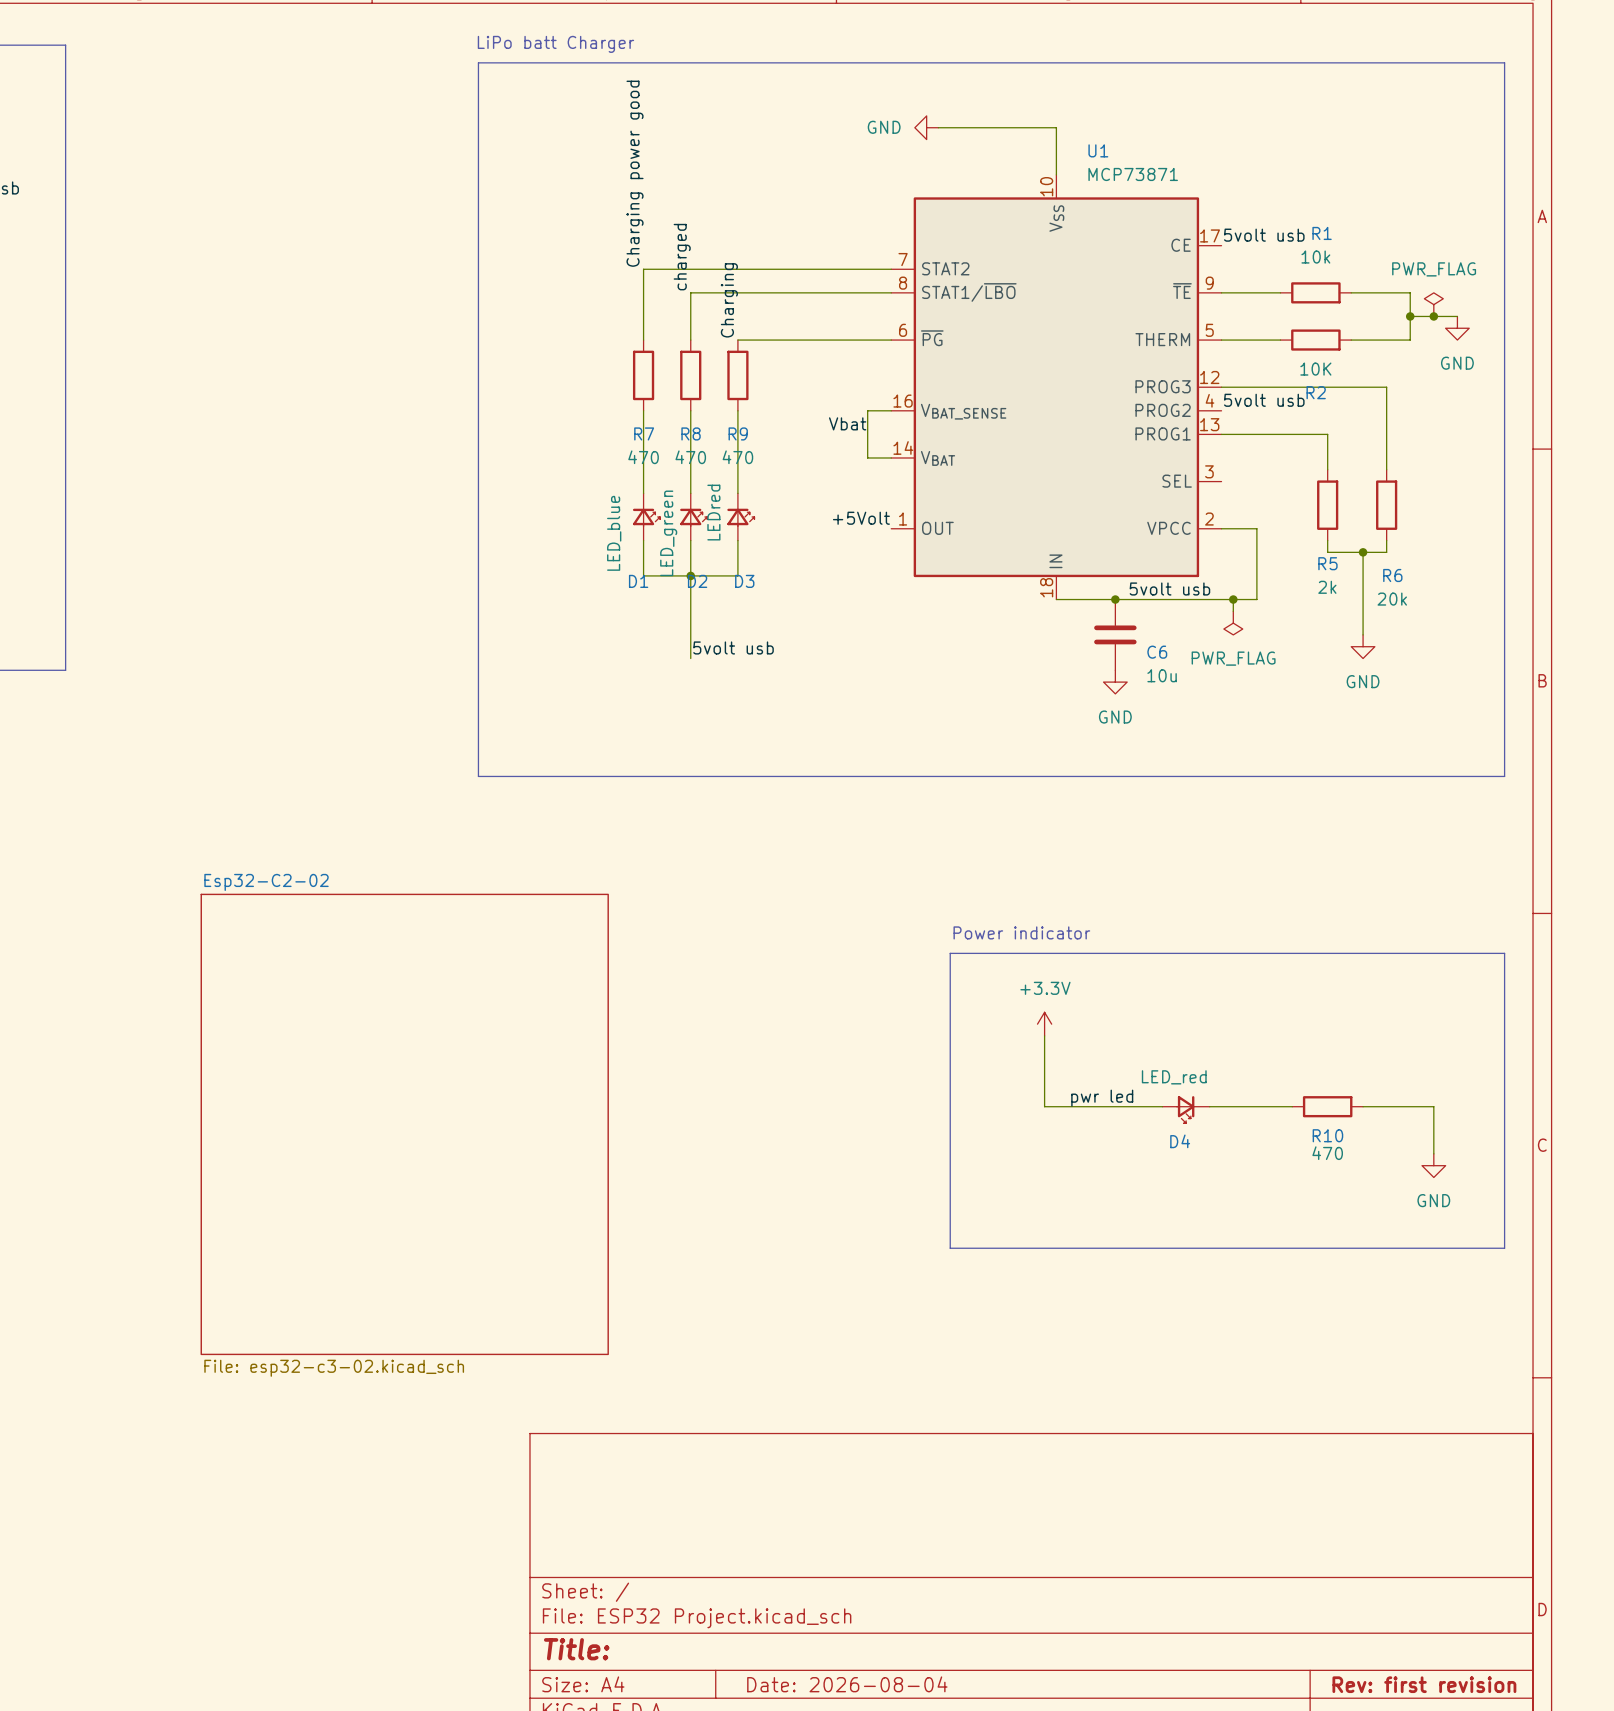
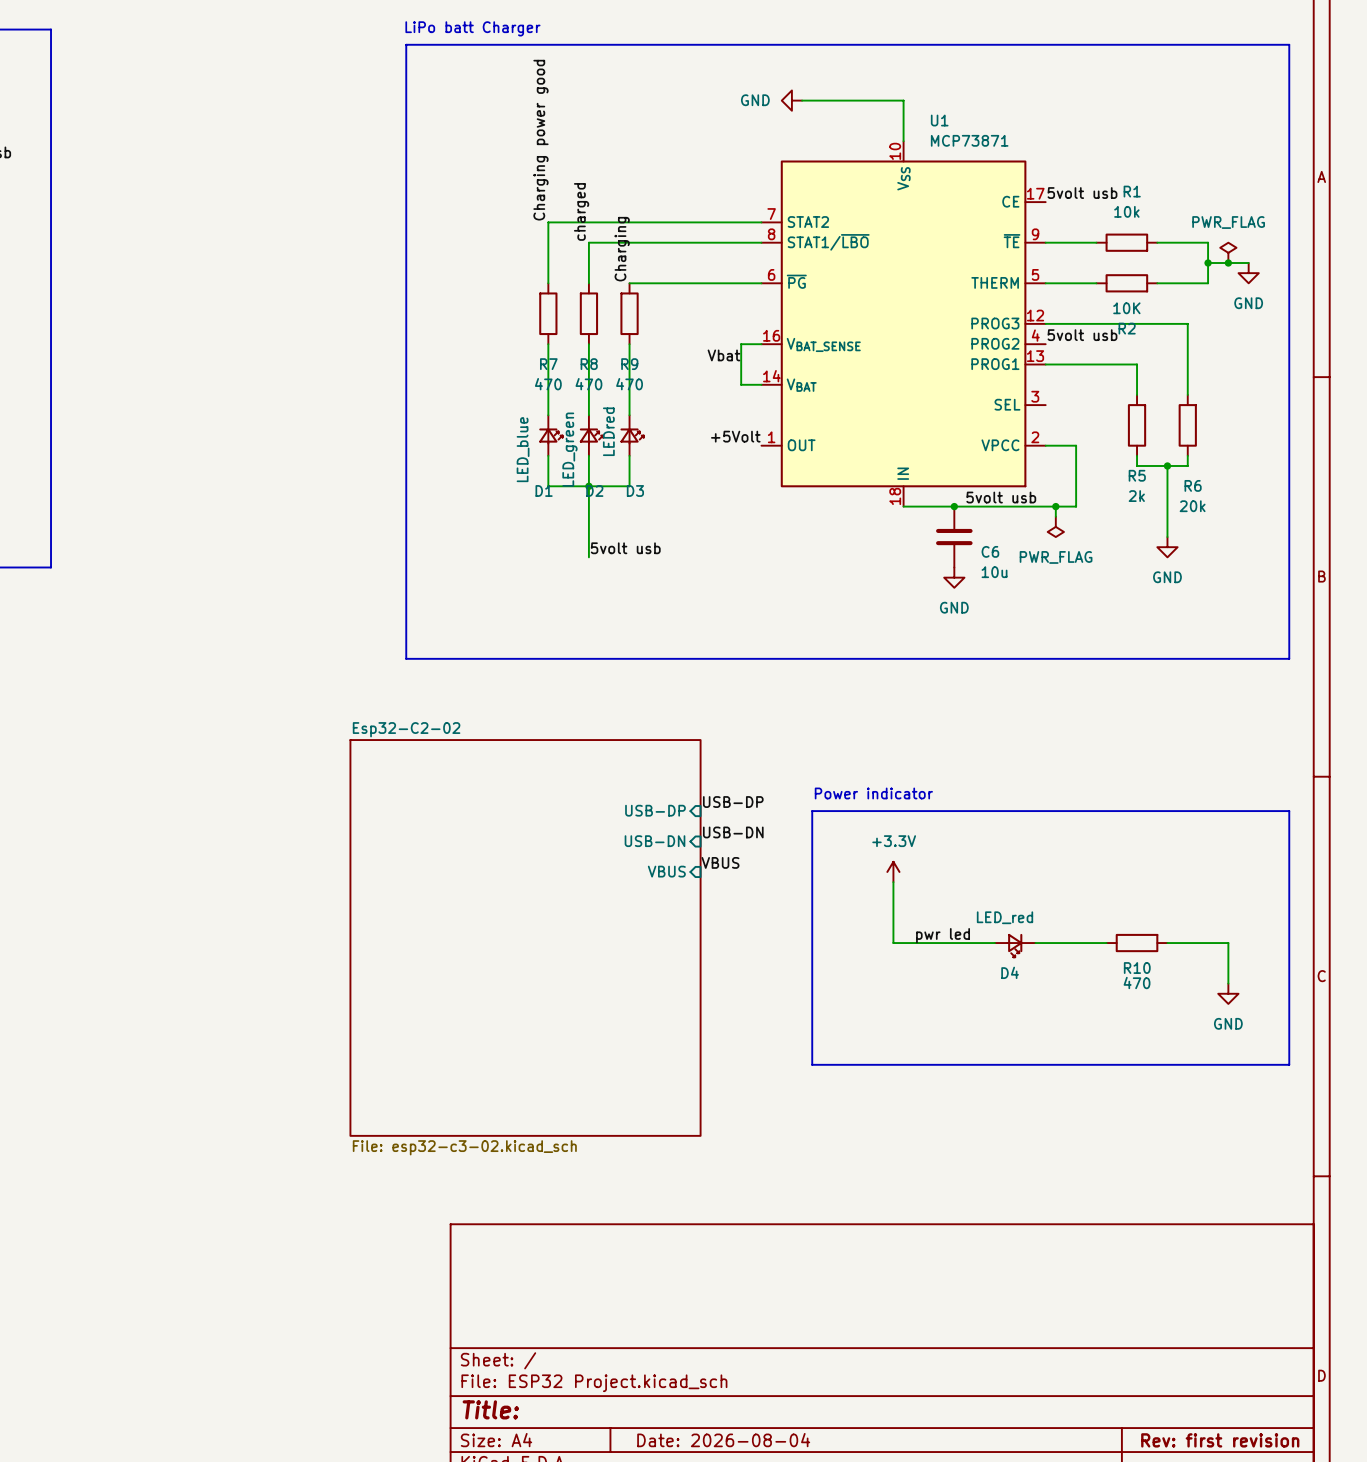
label: none -> USB-DP (733, 802)
sheet pin: none -> USB-DP (655, 810)
label: none -> USB-DN (733, 832)
sheet pin: none -> USB-DN (655, 841)
label: none -> VBUS (720, 862)
sheet pin: none -> VBUS (666, 871)
sheet Esp32-C2-02 position: (404, 1124) -> (525, 937)

